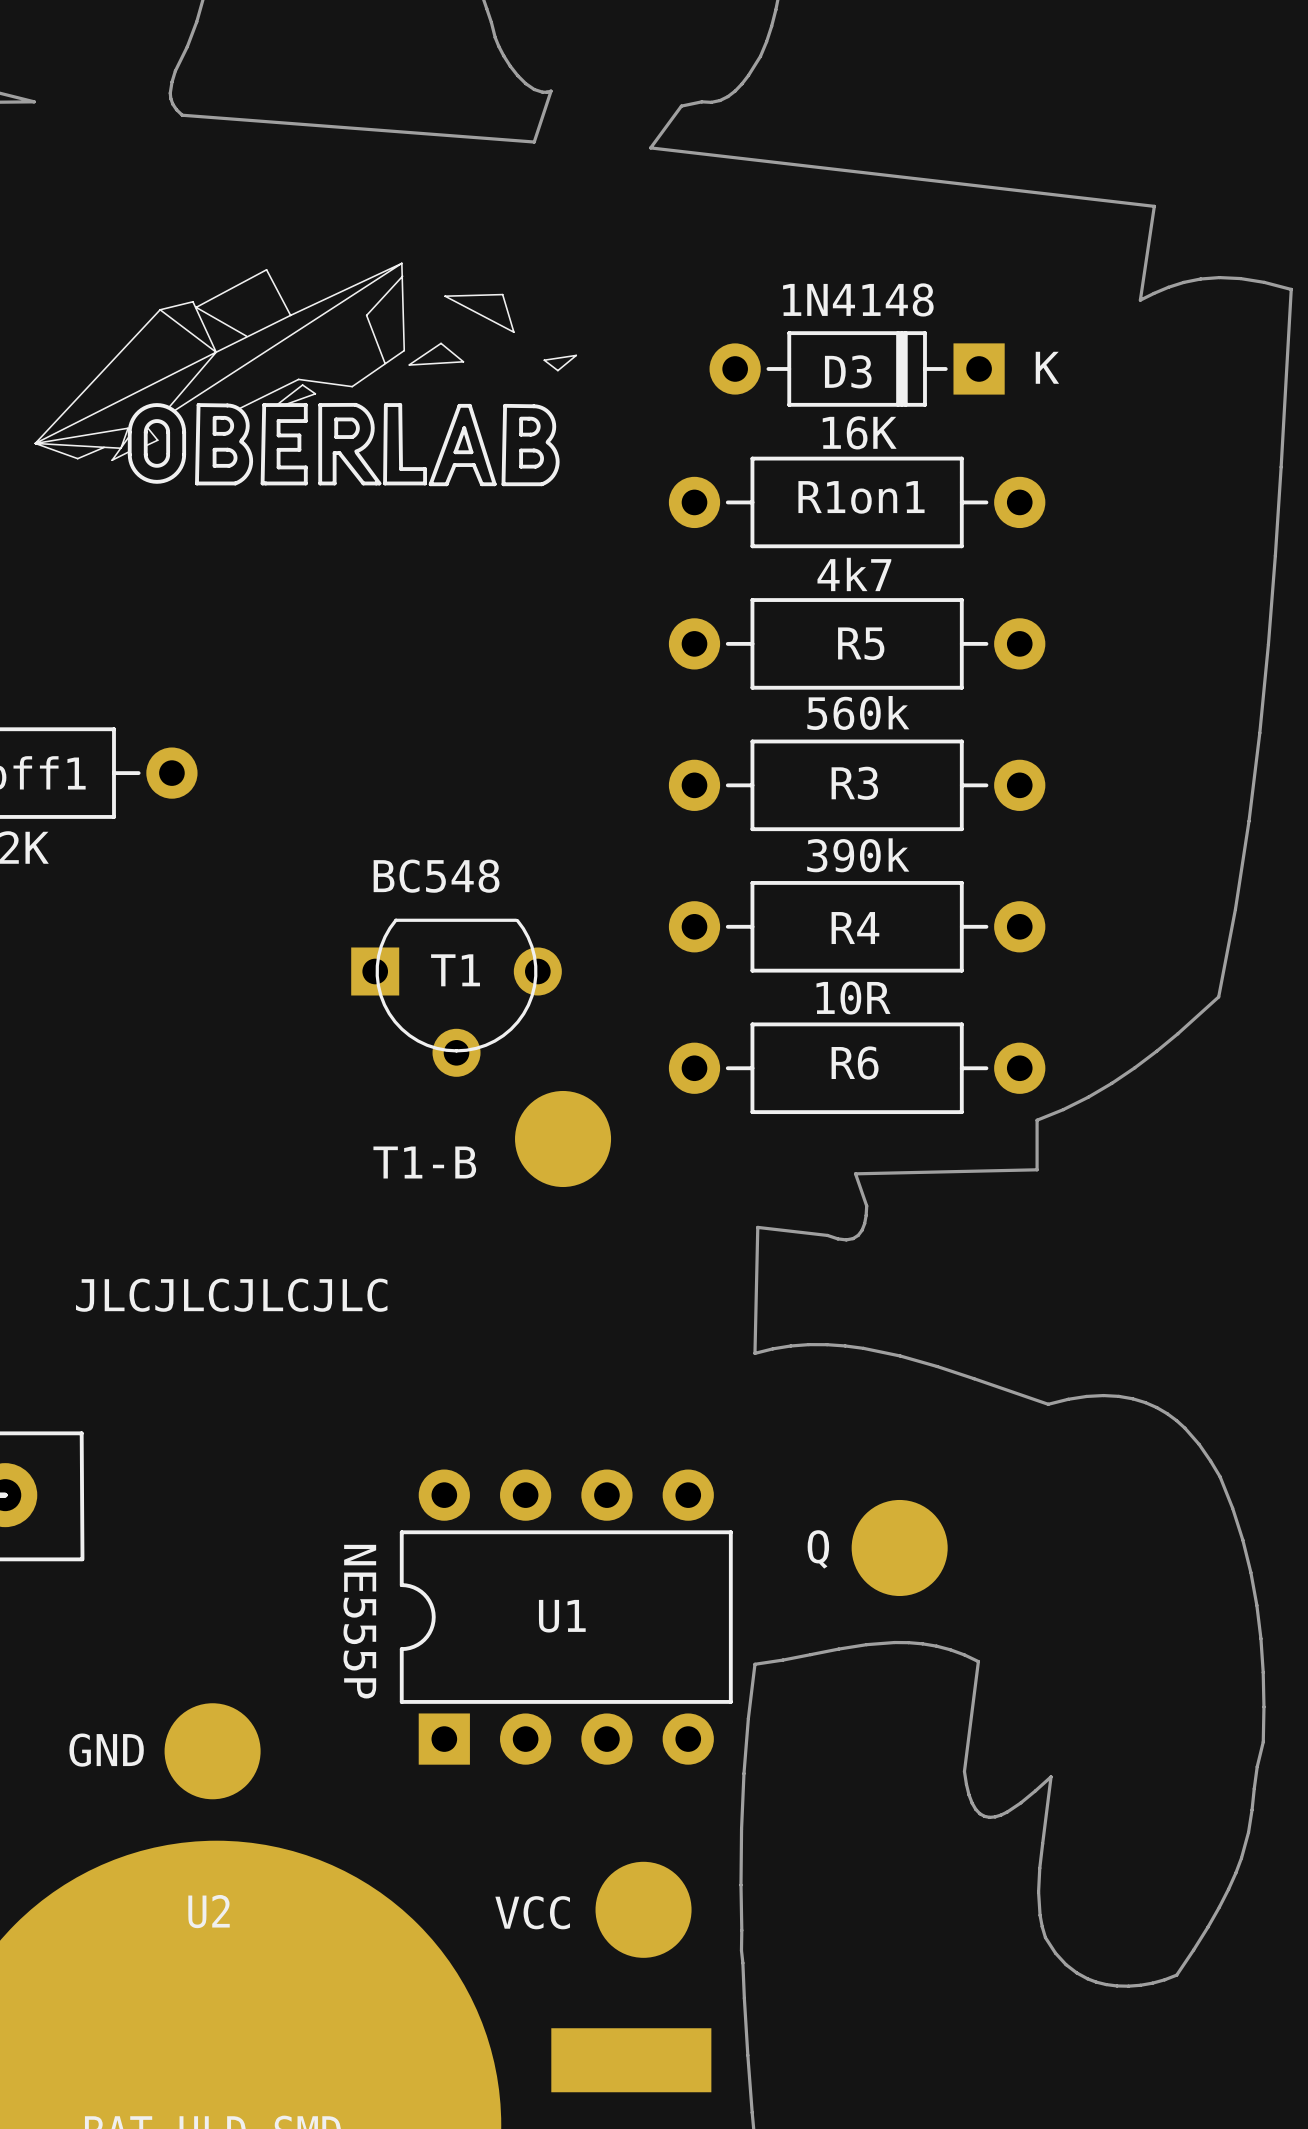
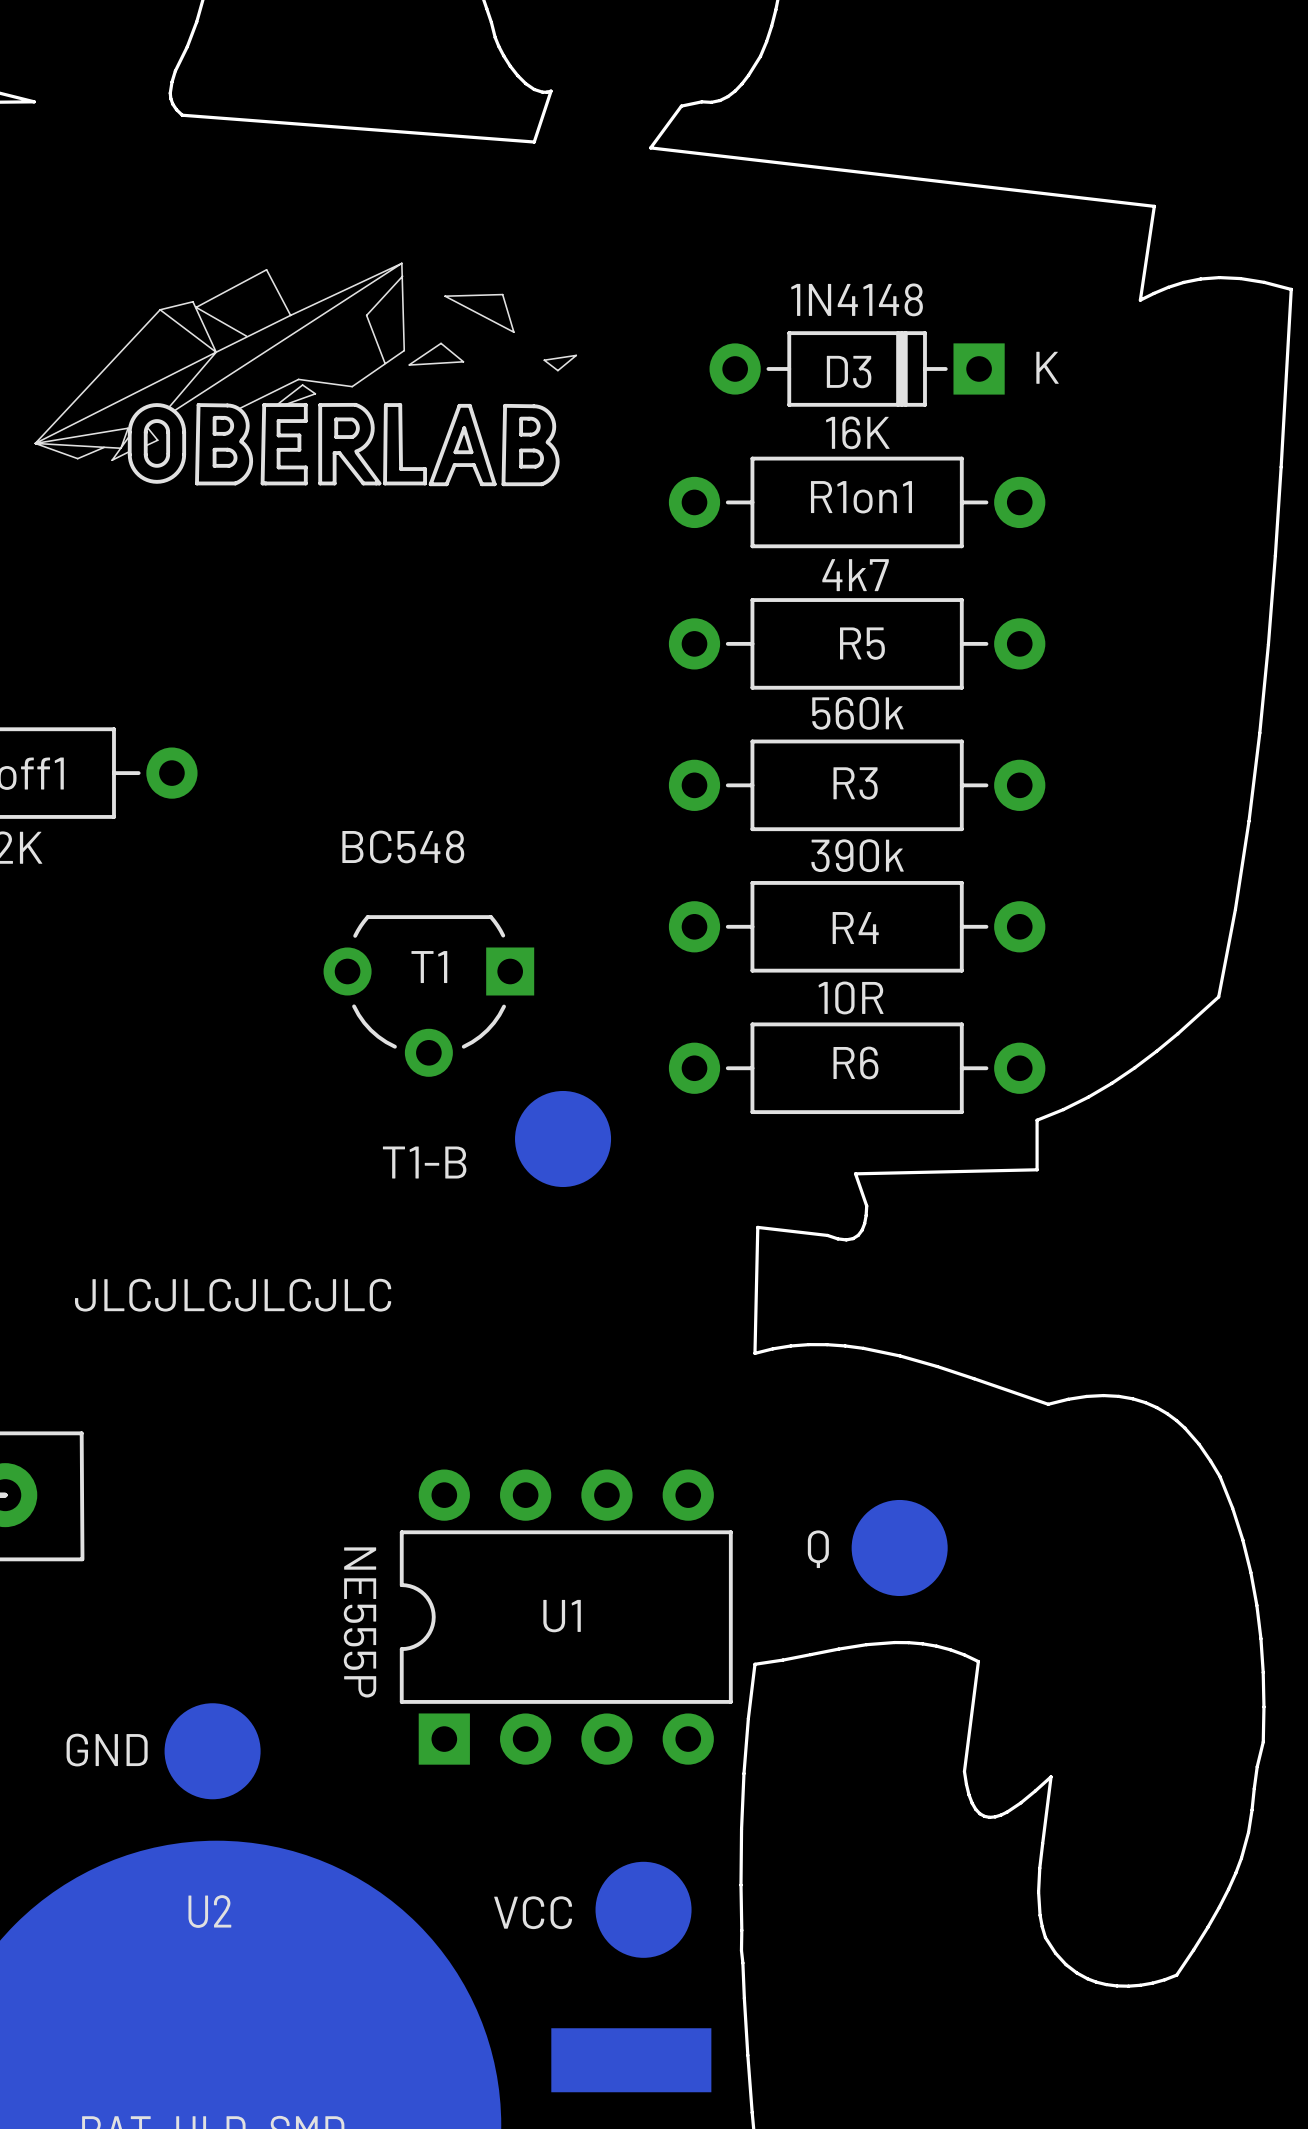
text position: BC548 (436, 876) -> BC548 (403, 846)
T1 side: top (456, 997) -> bottom (428, 995)

